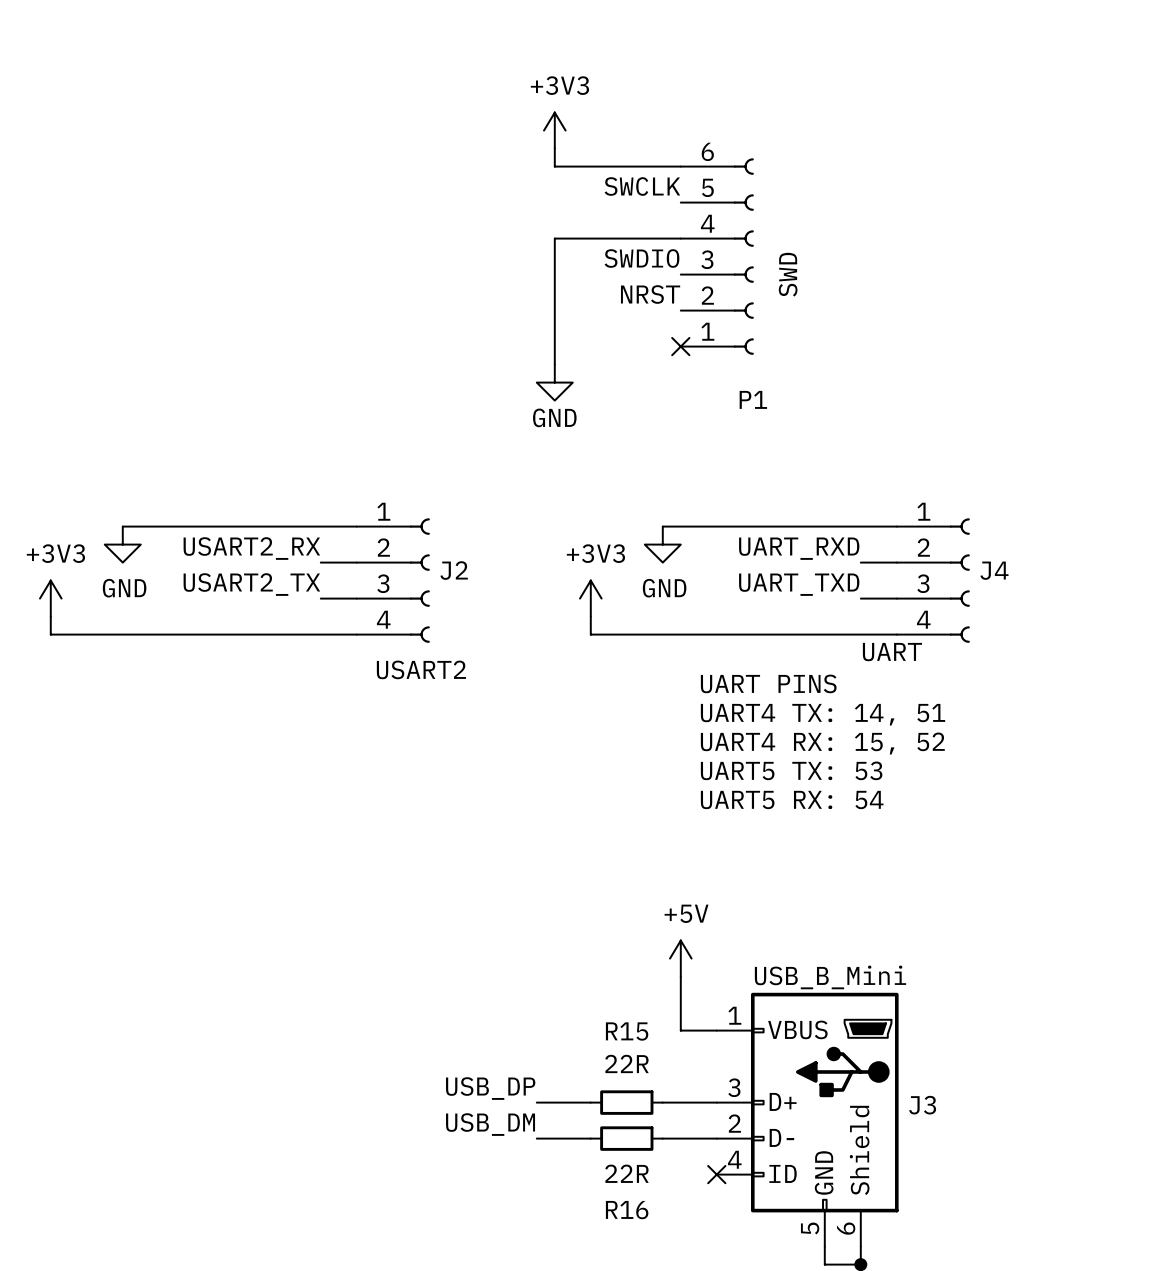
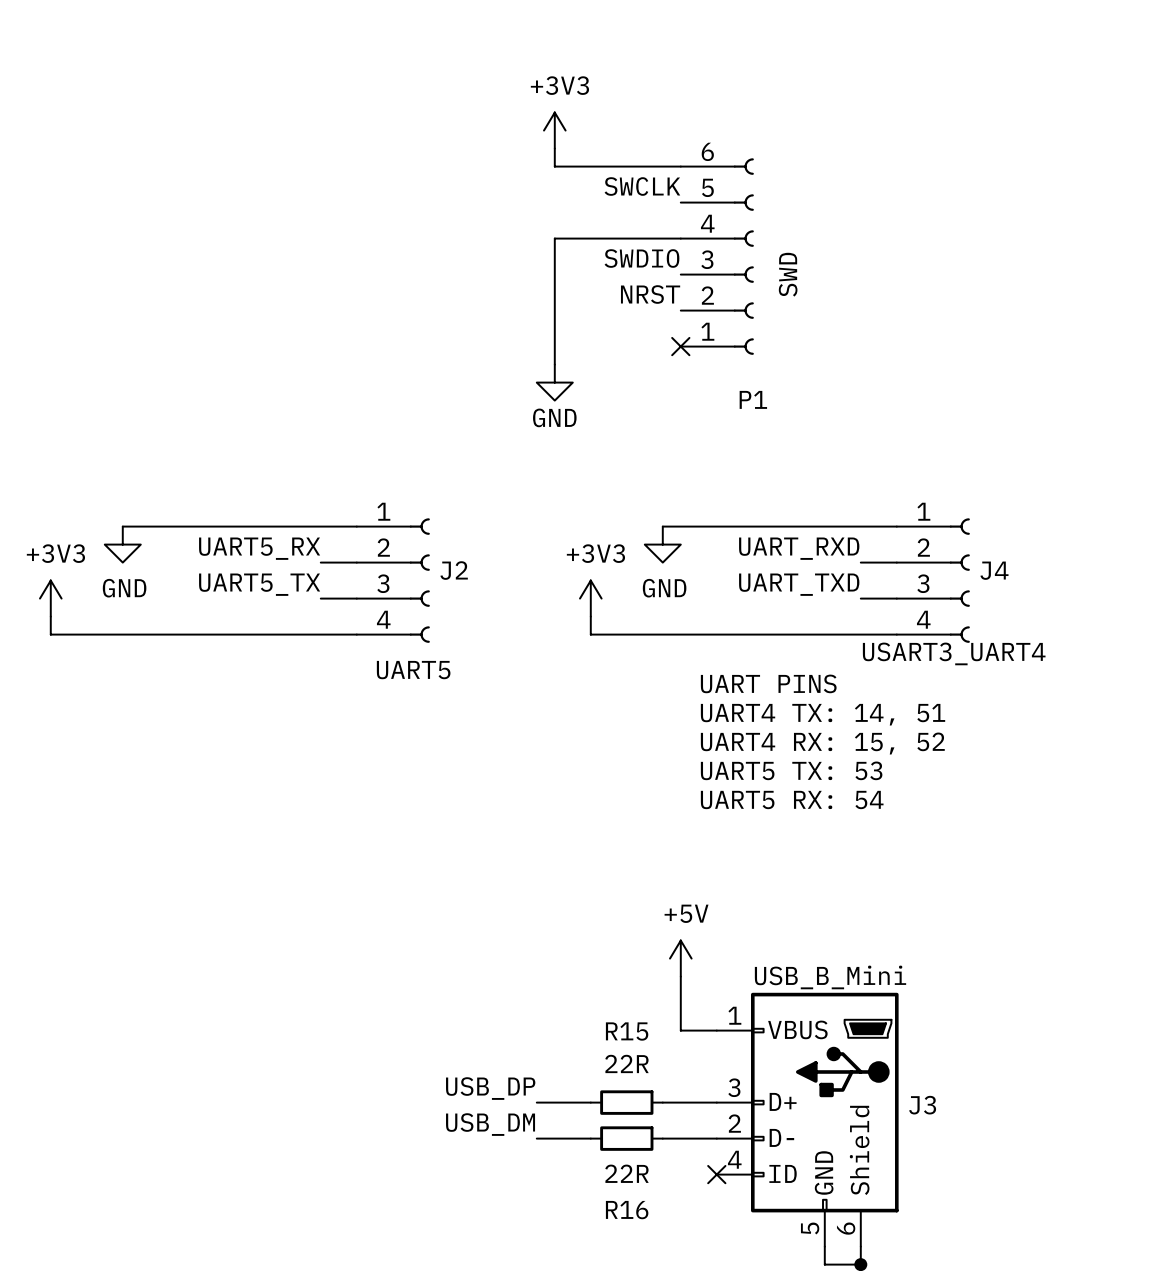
label: USART2_RX (251, 548) -> UART5_RX (259, 548)
label: USART2_TX (251, 584) -> UART5_TX (259, 584)
J4 value: UART (892, 652) -> USART3_UART4 (954, 653)
J2 value: USART2 (421, 669) -> UART5 (413, 670)

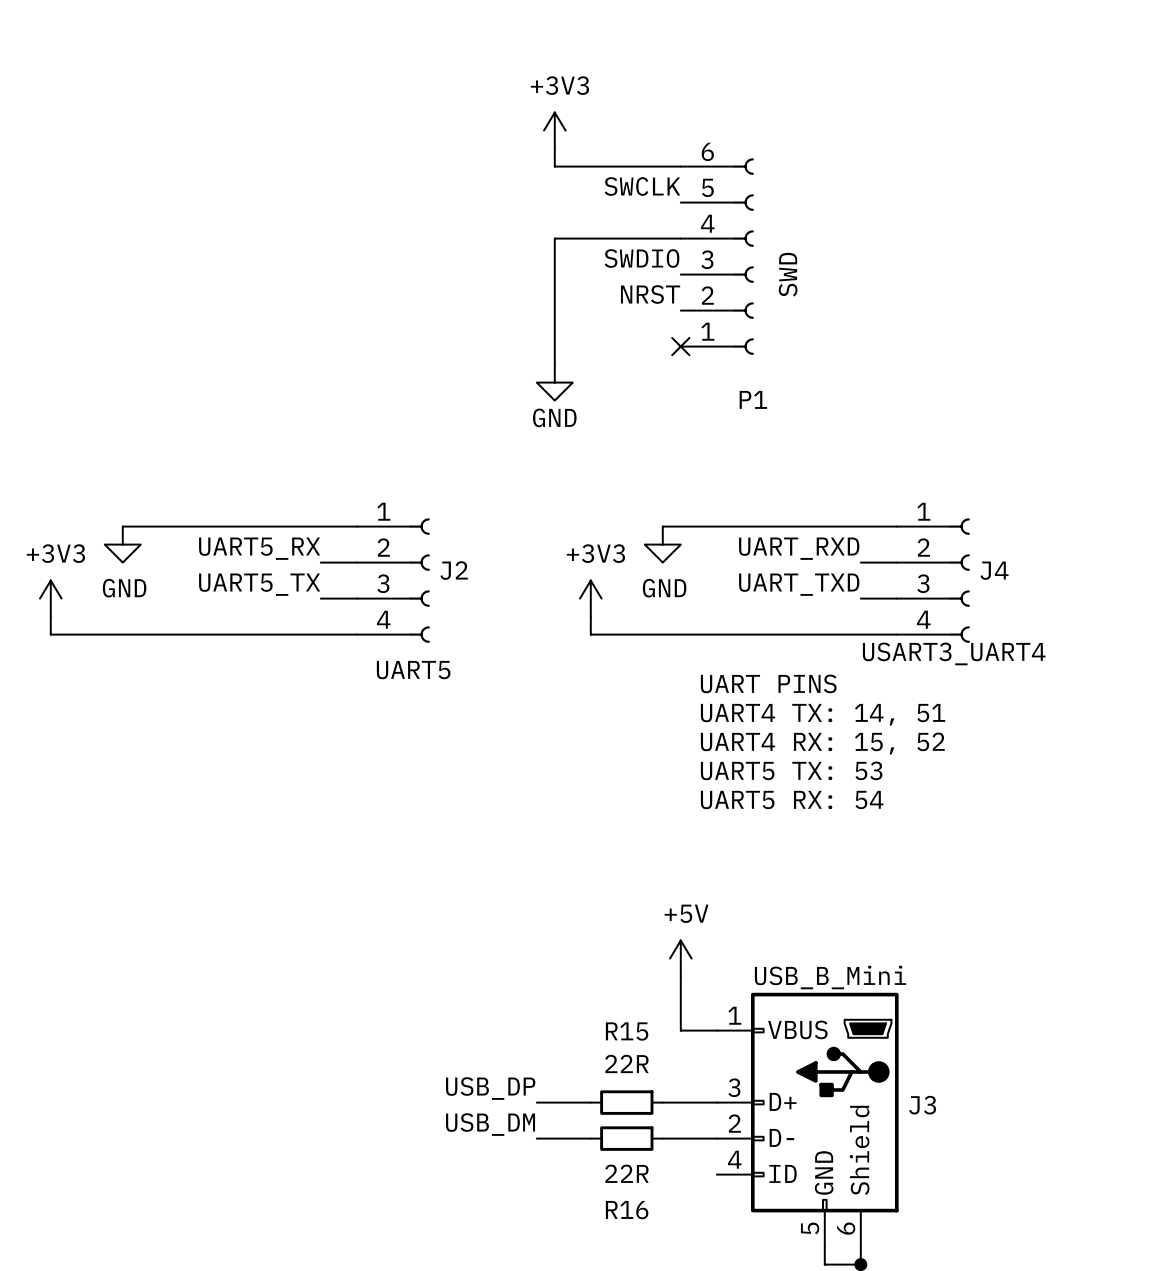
no-connect mark: (716, 1174) -> none

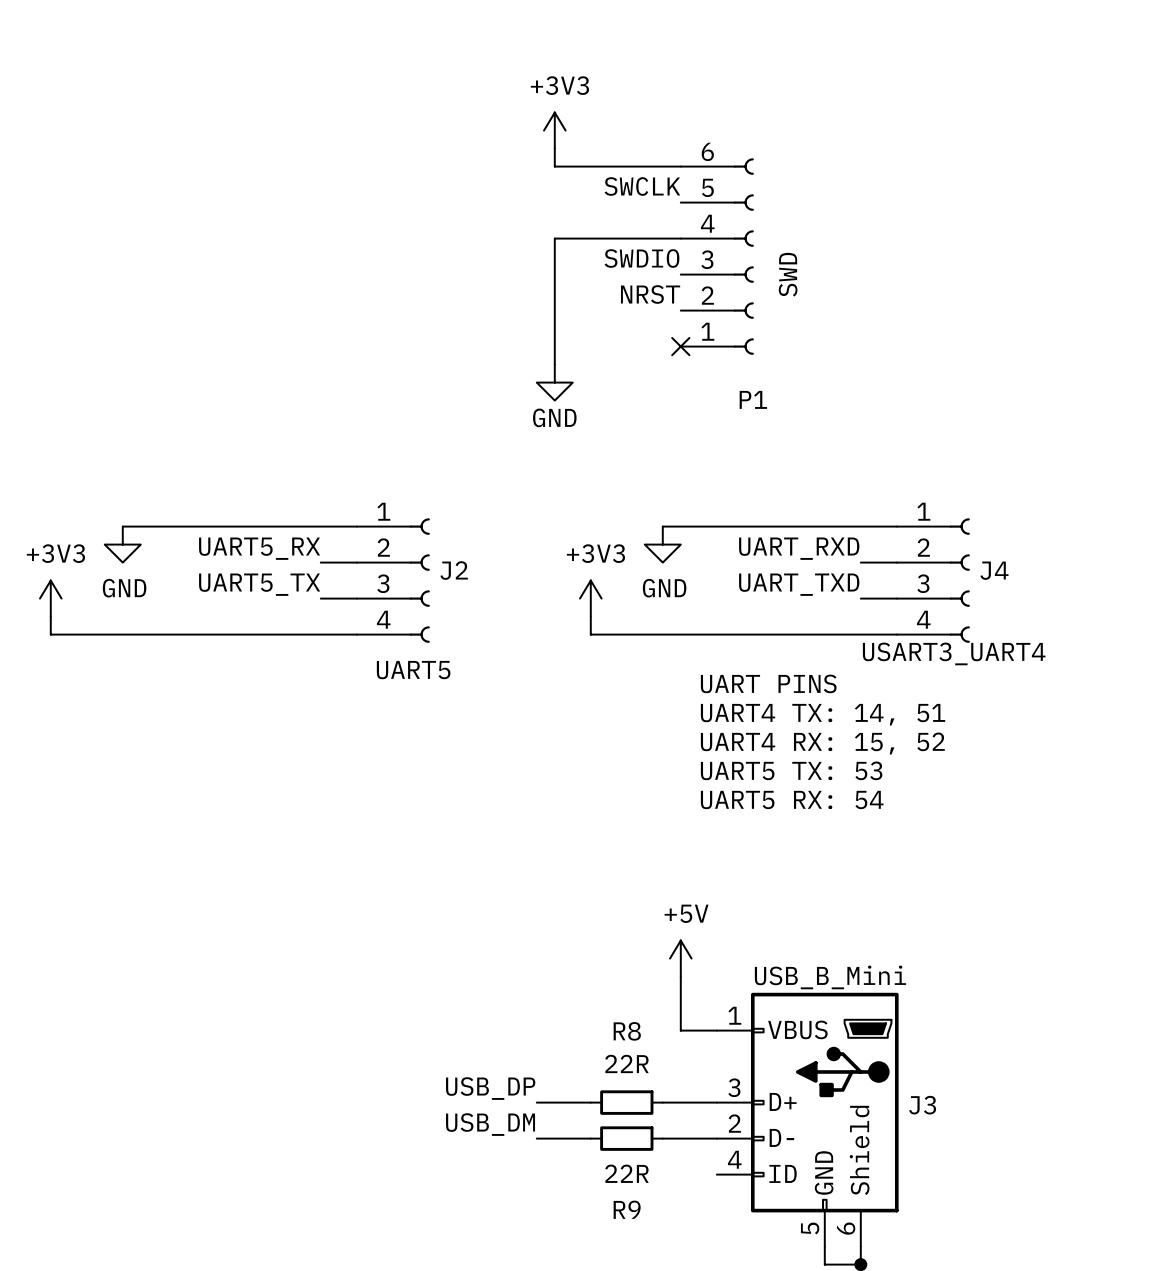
R15 name: R15 (627, 1031) -> R8 (627, 1031)
R16 name: R16 (627, 1210) -> R9 (627, 1209)

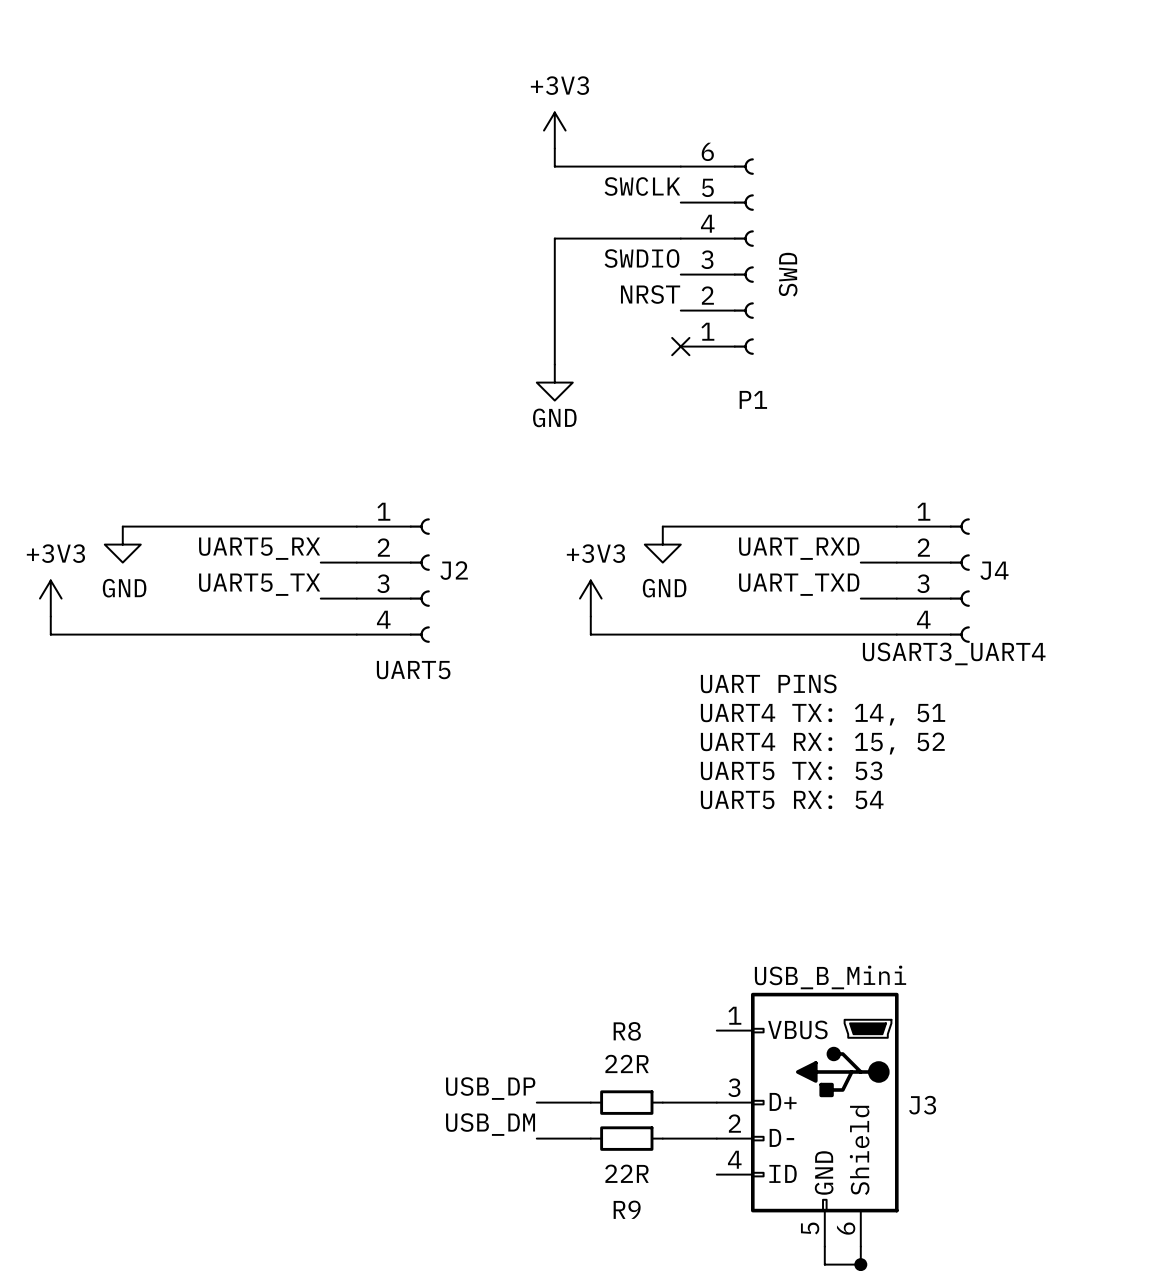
power symbol: +5V (680, 958) -> none
wire: (680, 976) (680, 1030) (716, 1030) -> none

